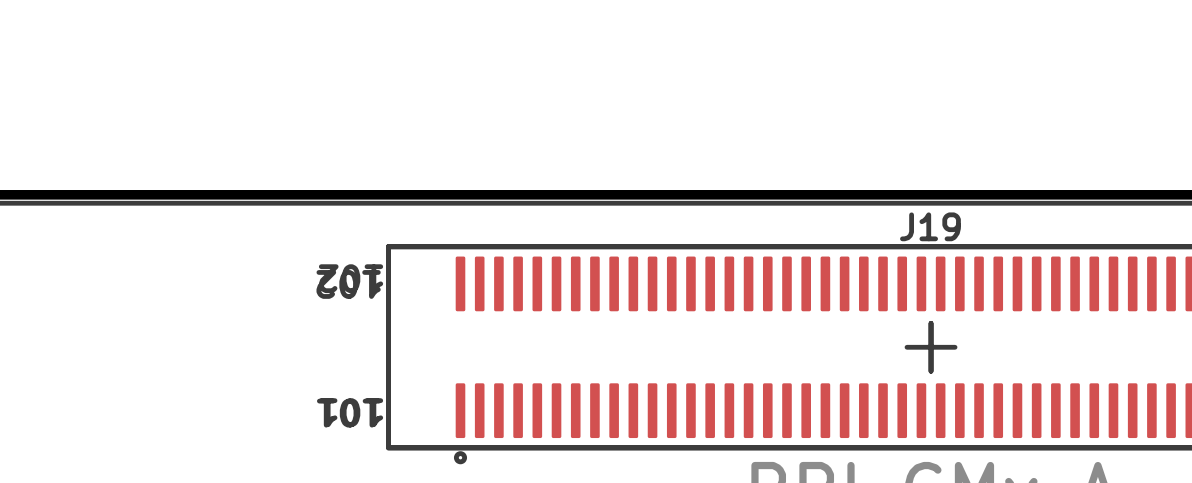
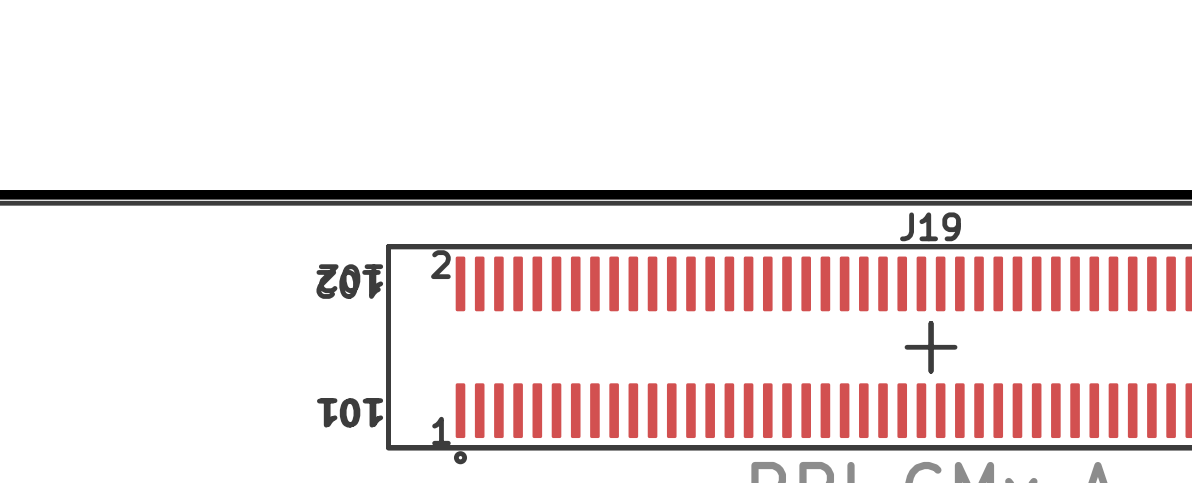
J19 text: none -> 2 (440, 264)
J19 text: none -> 1 (441, 431)

